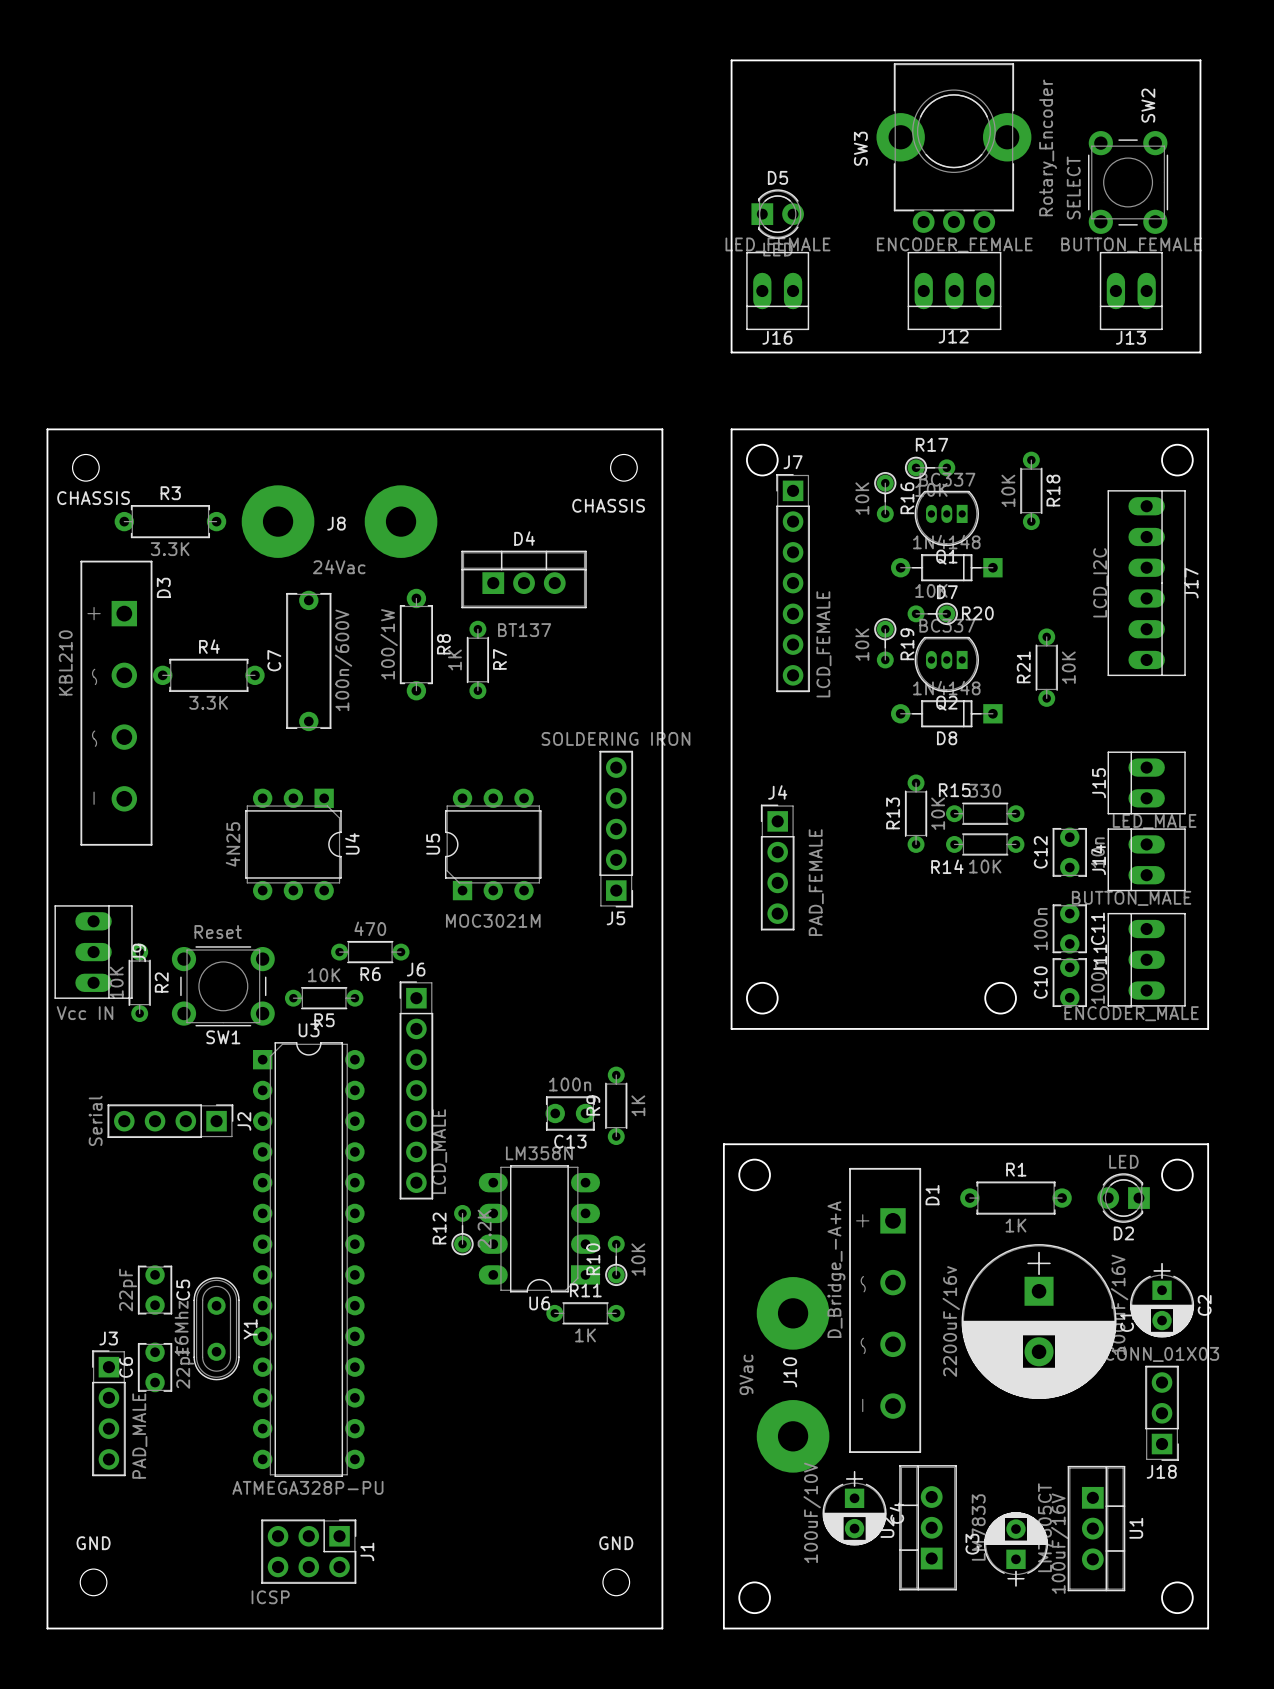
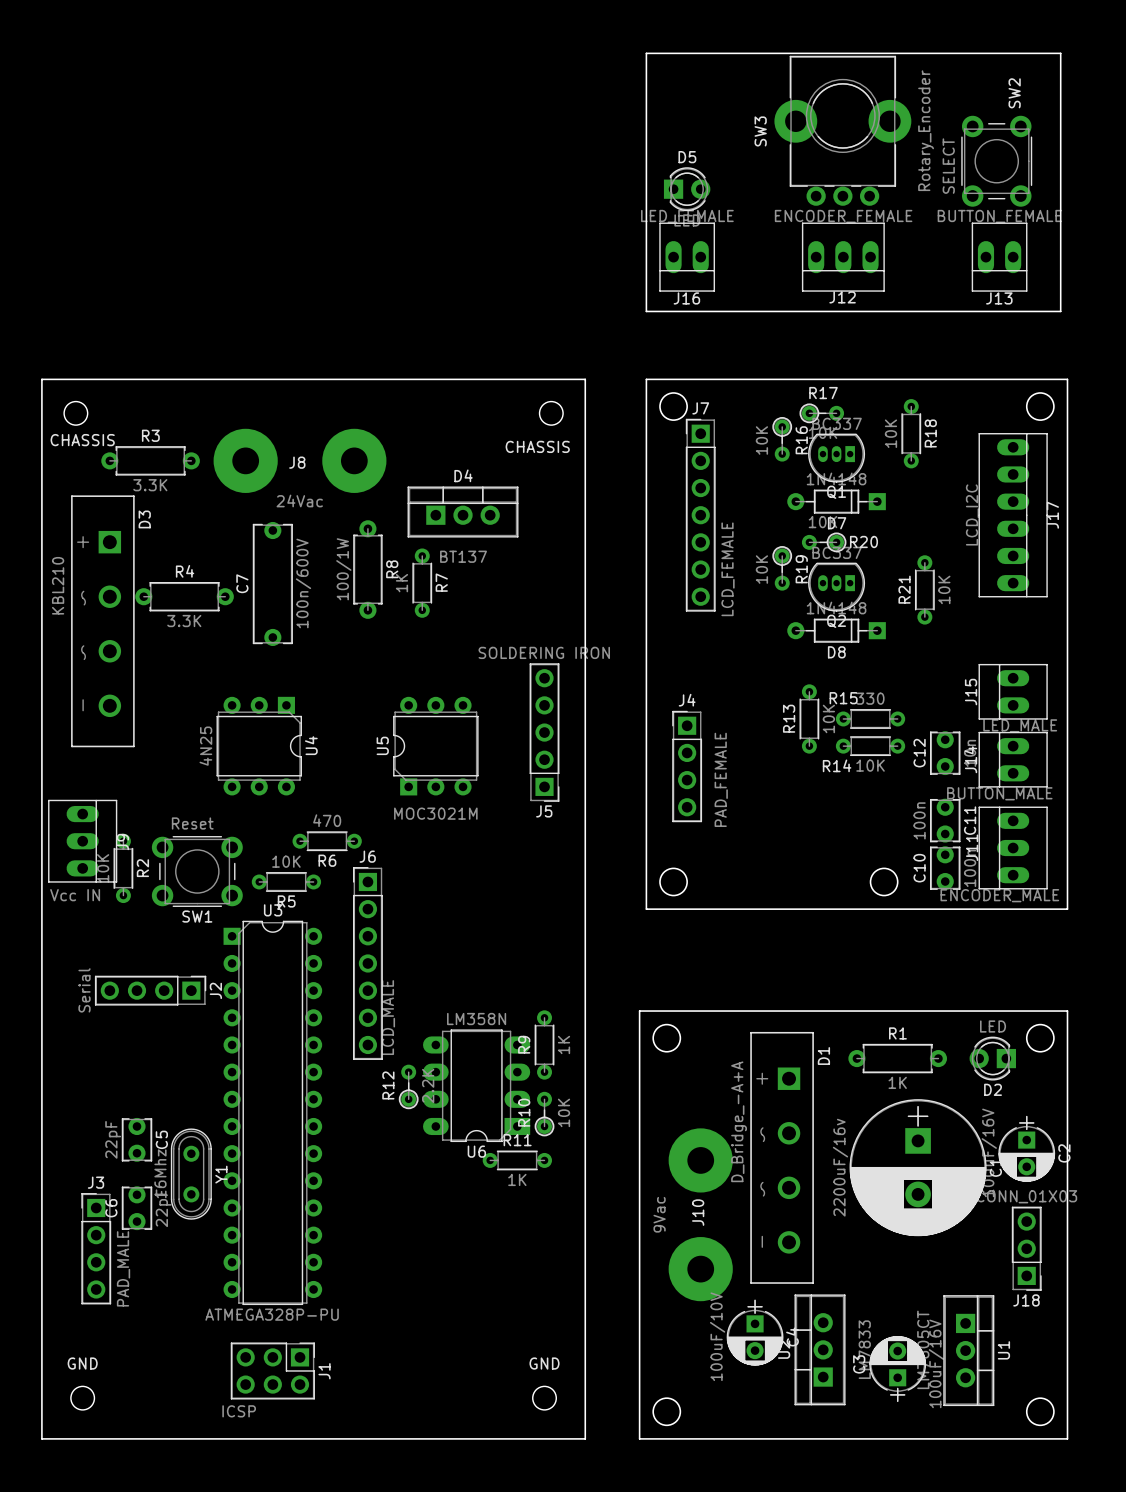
R9 position: (616, 1105) -> (544, 1044)
C13: 100n (570, 1113) -> none

